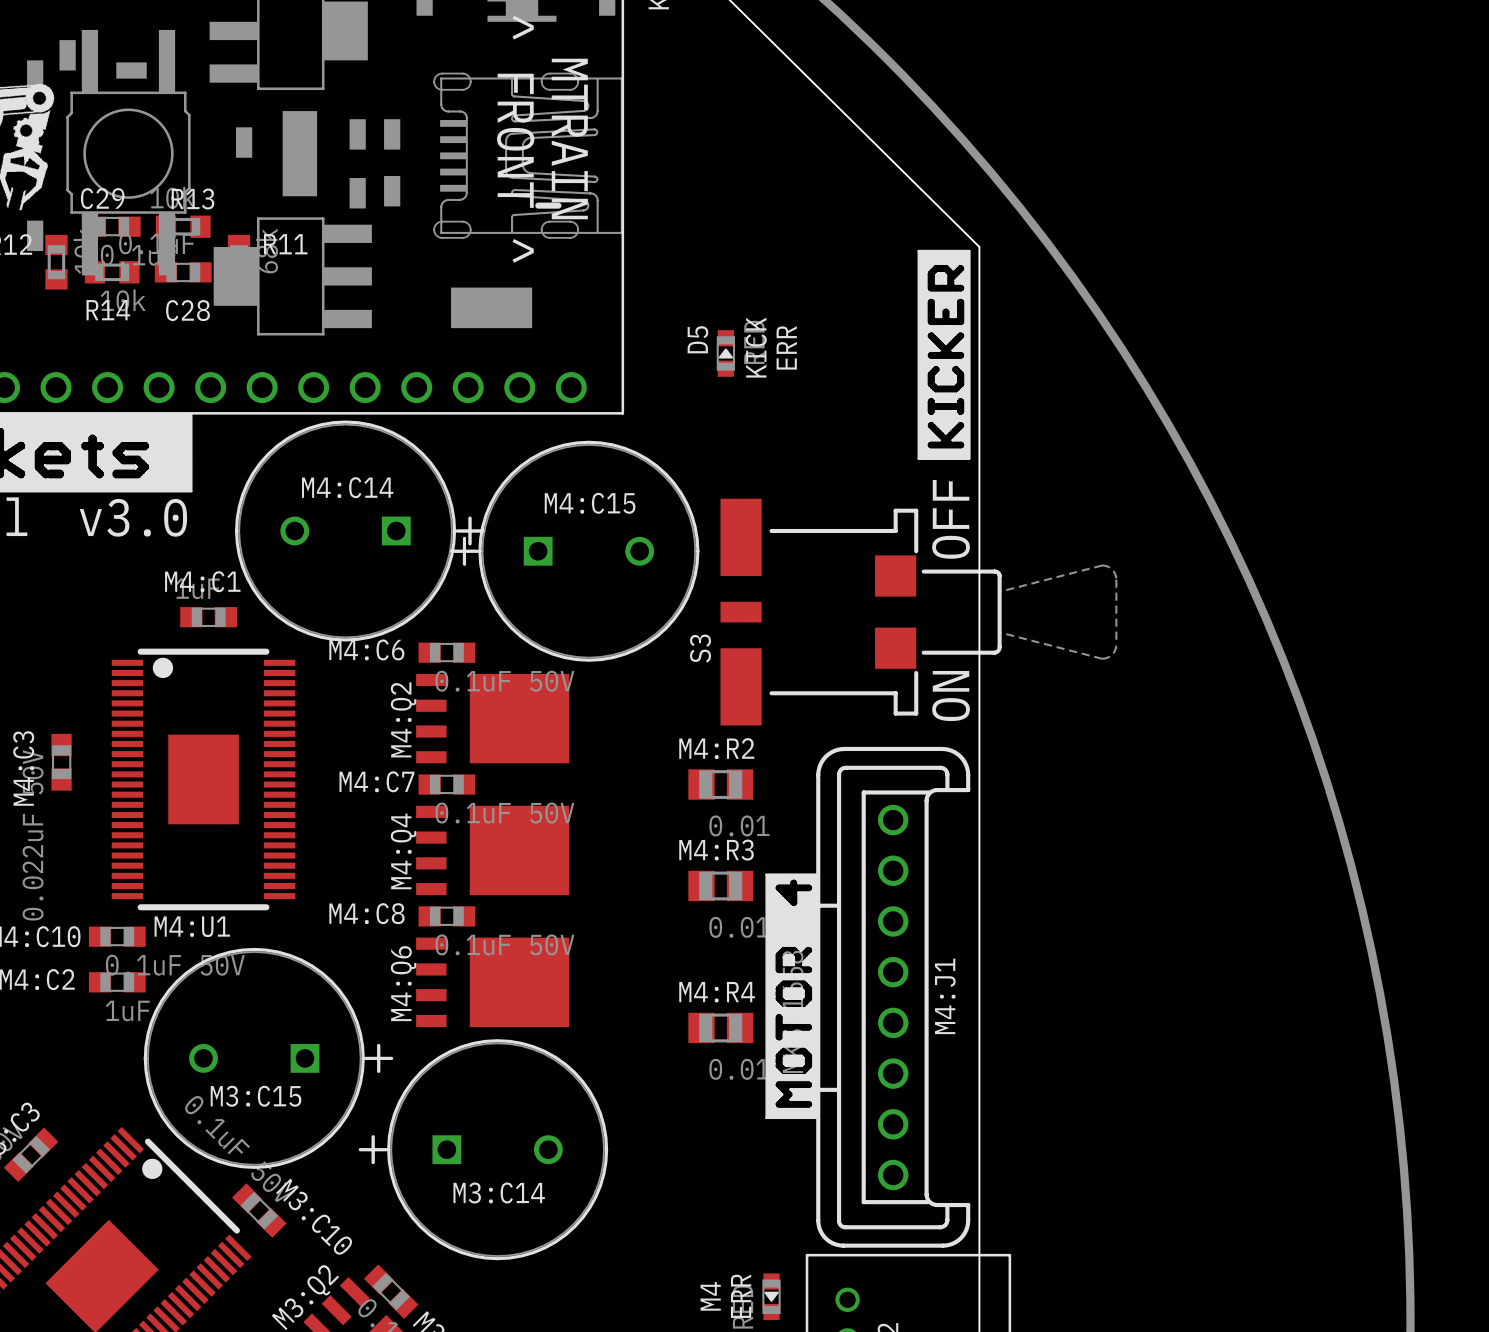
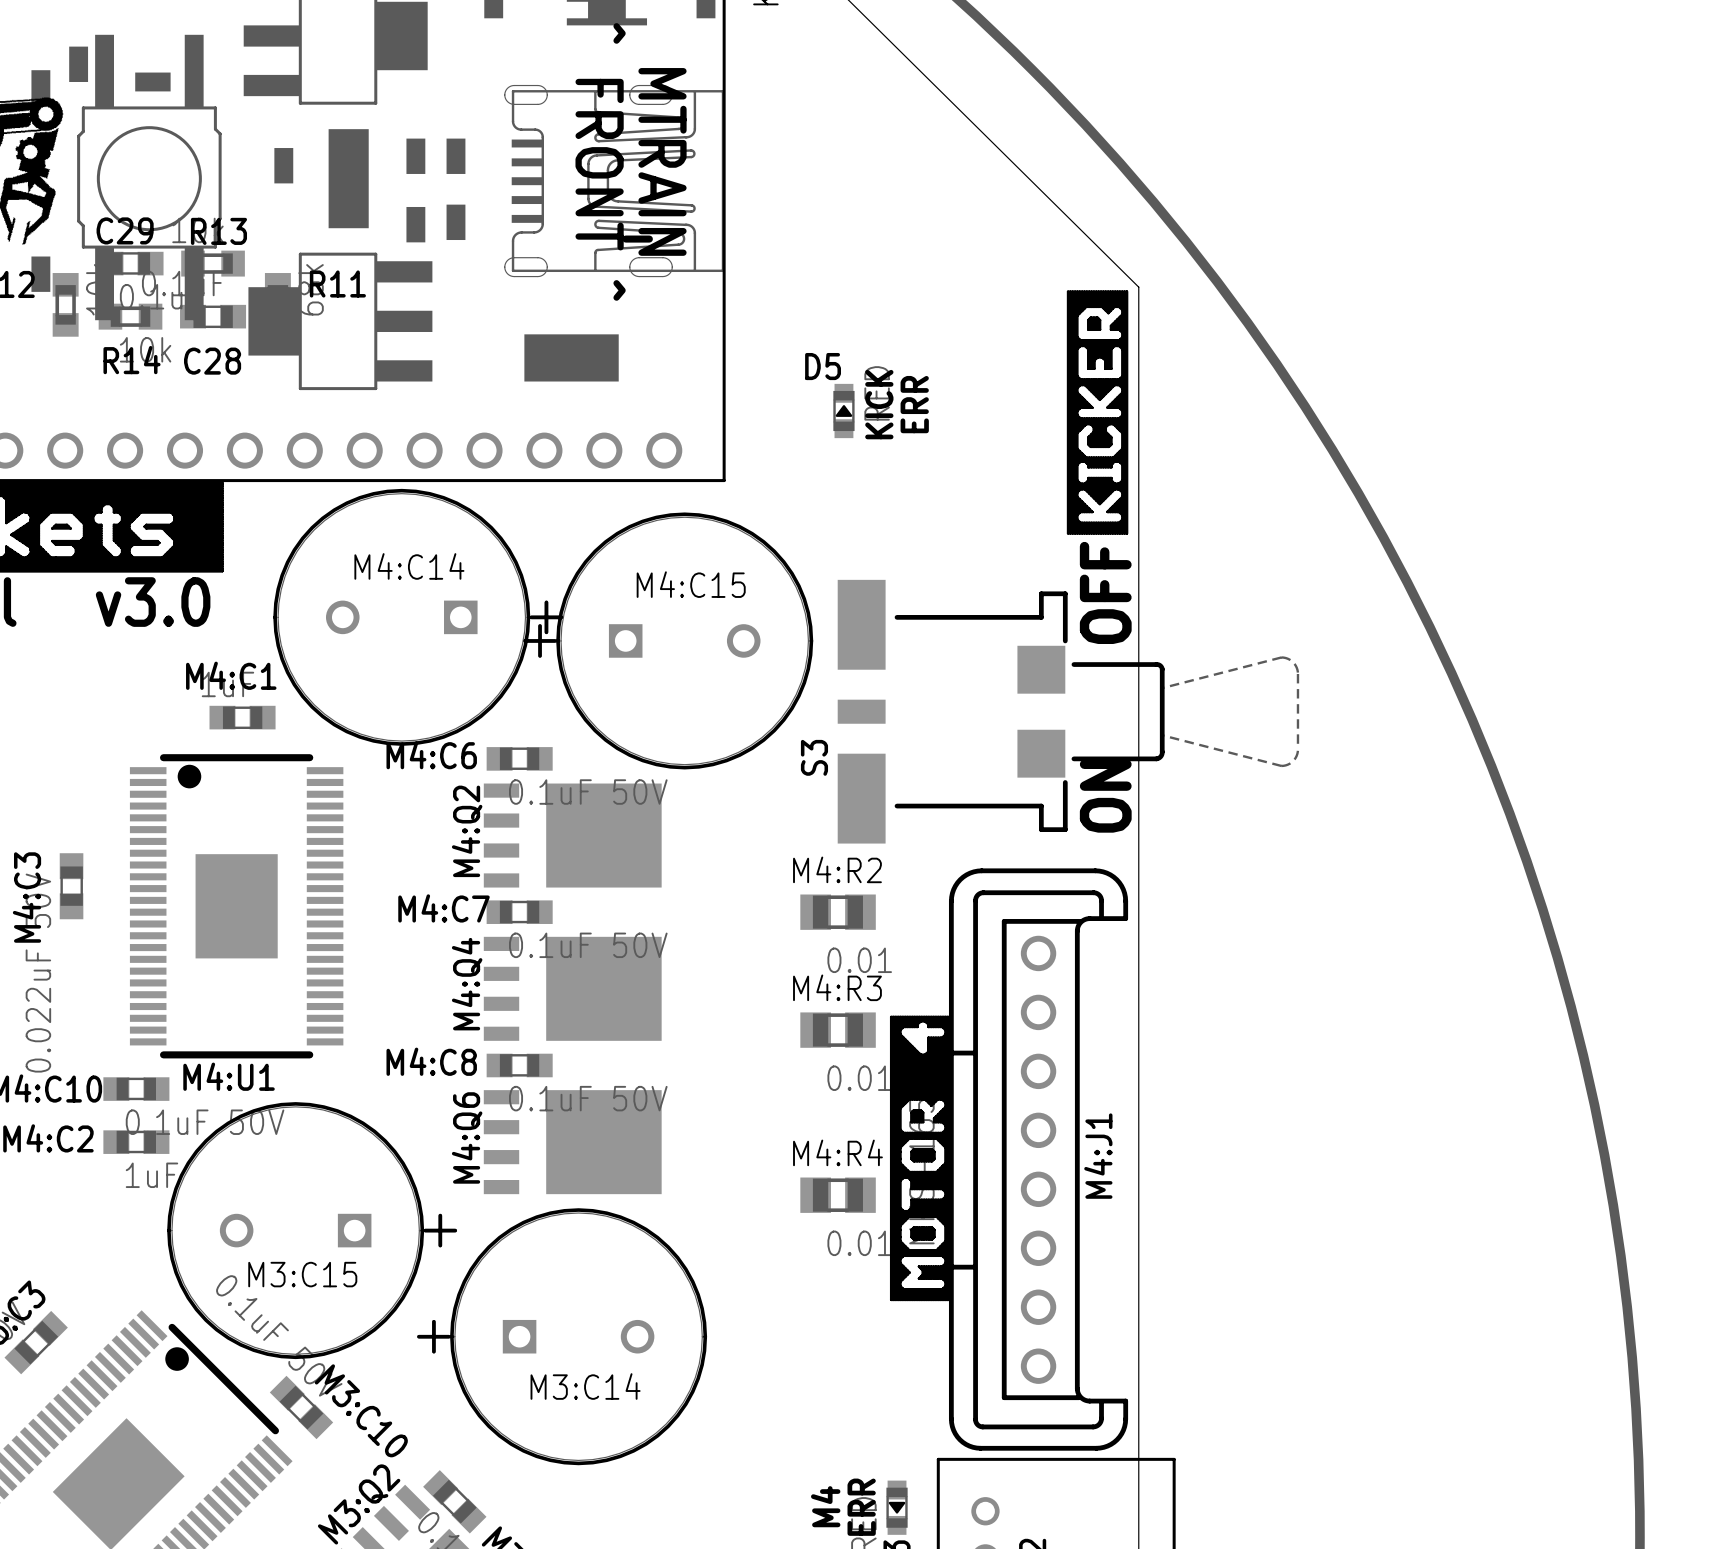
D5 name rotation: 0° (697, 339) -> 90° clockwise (823, 366)

